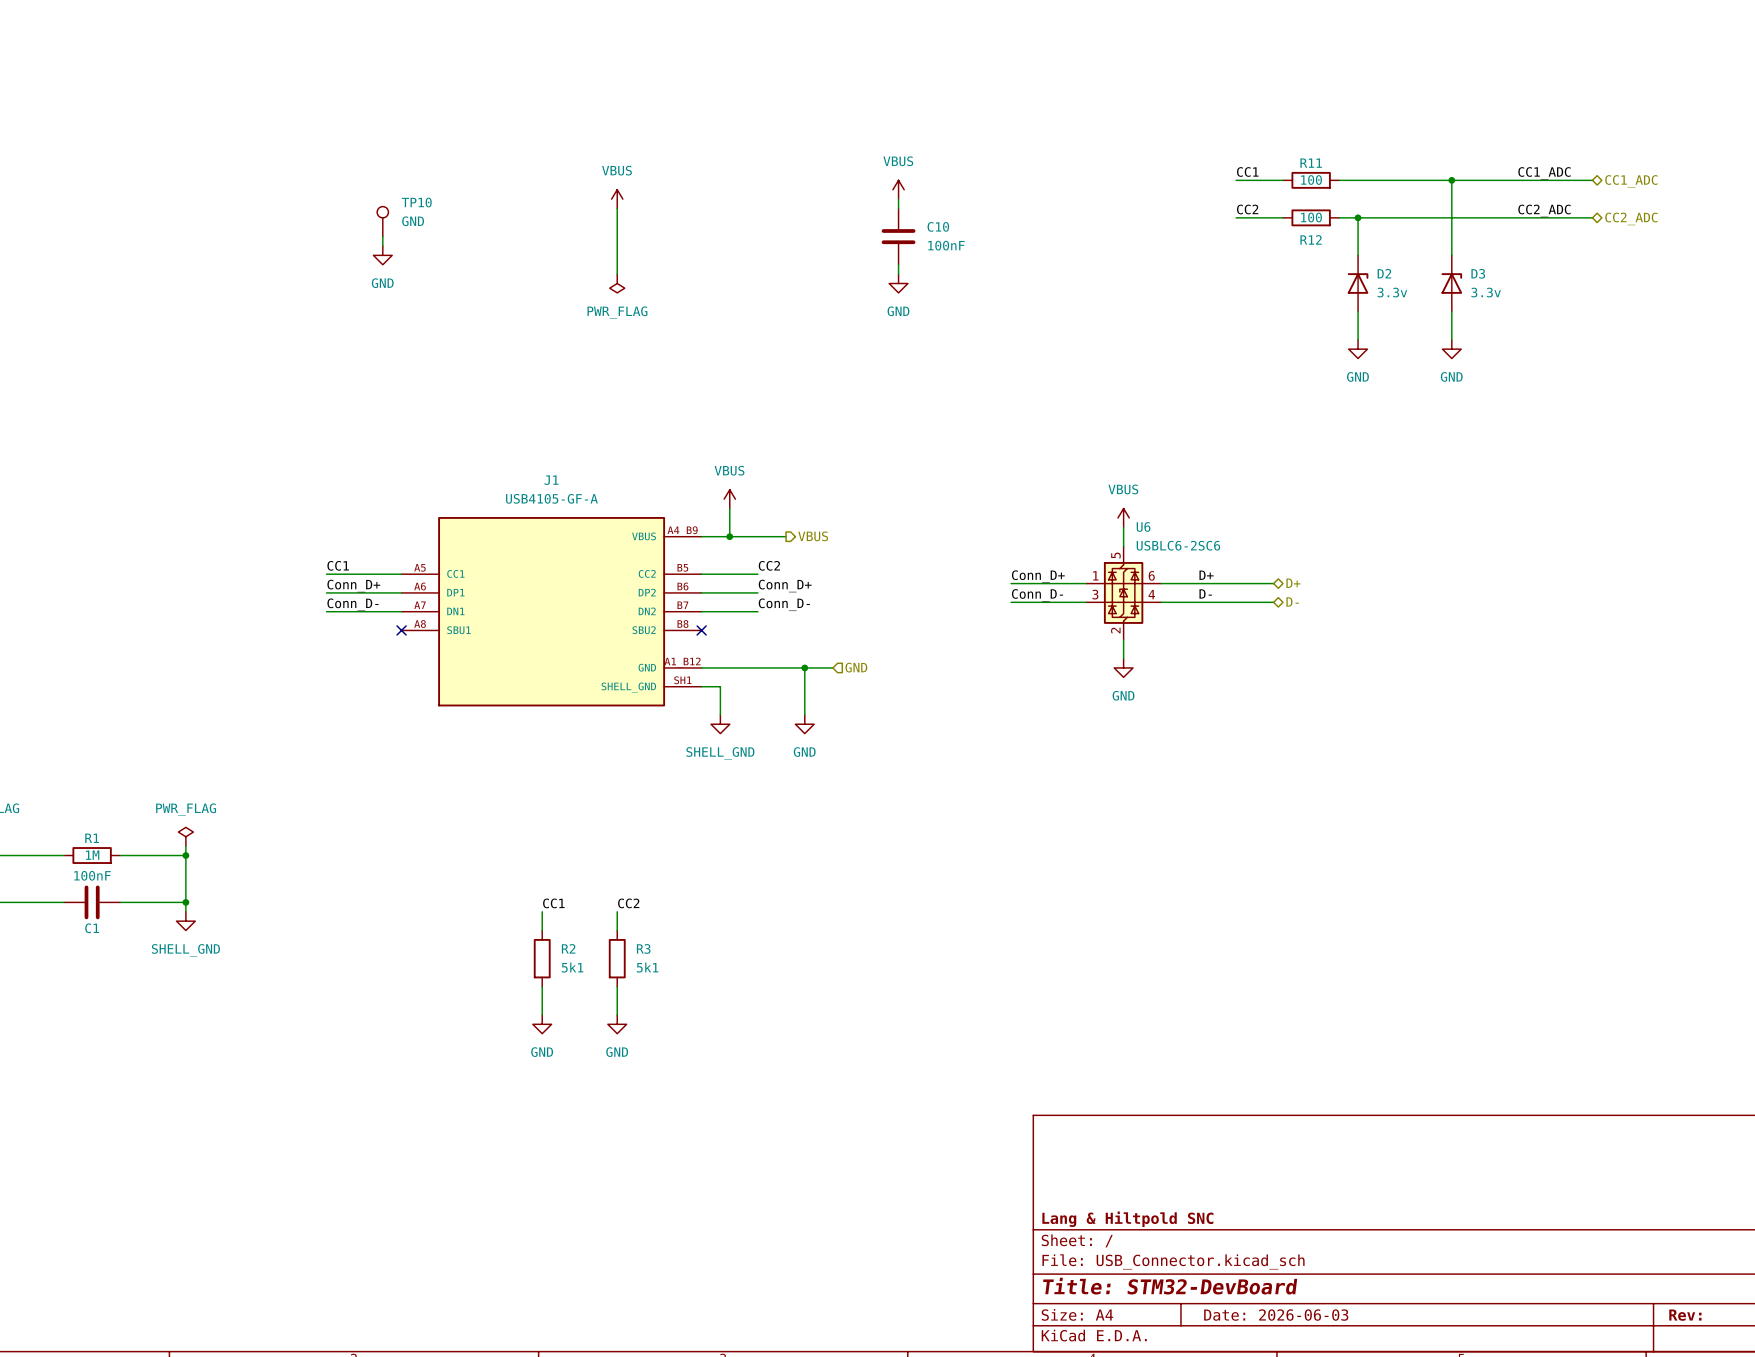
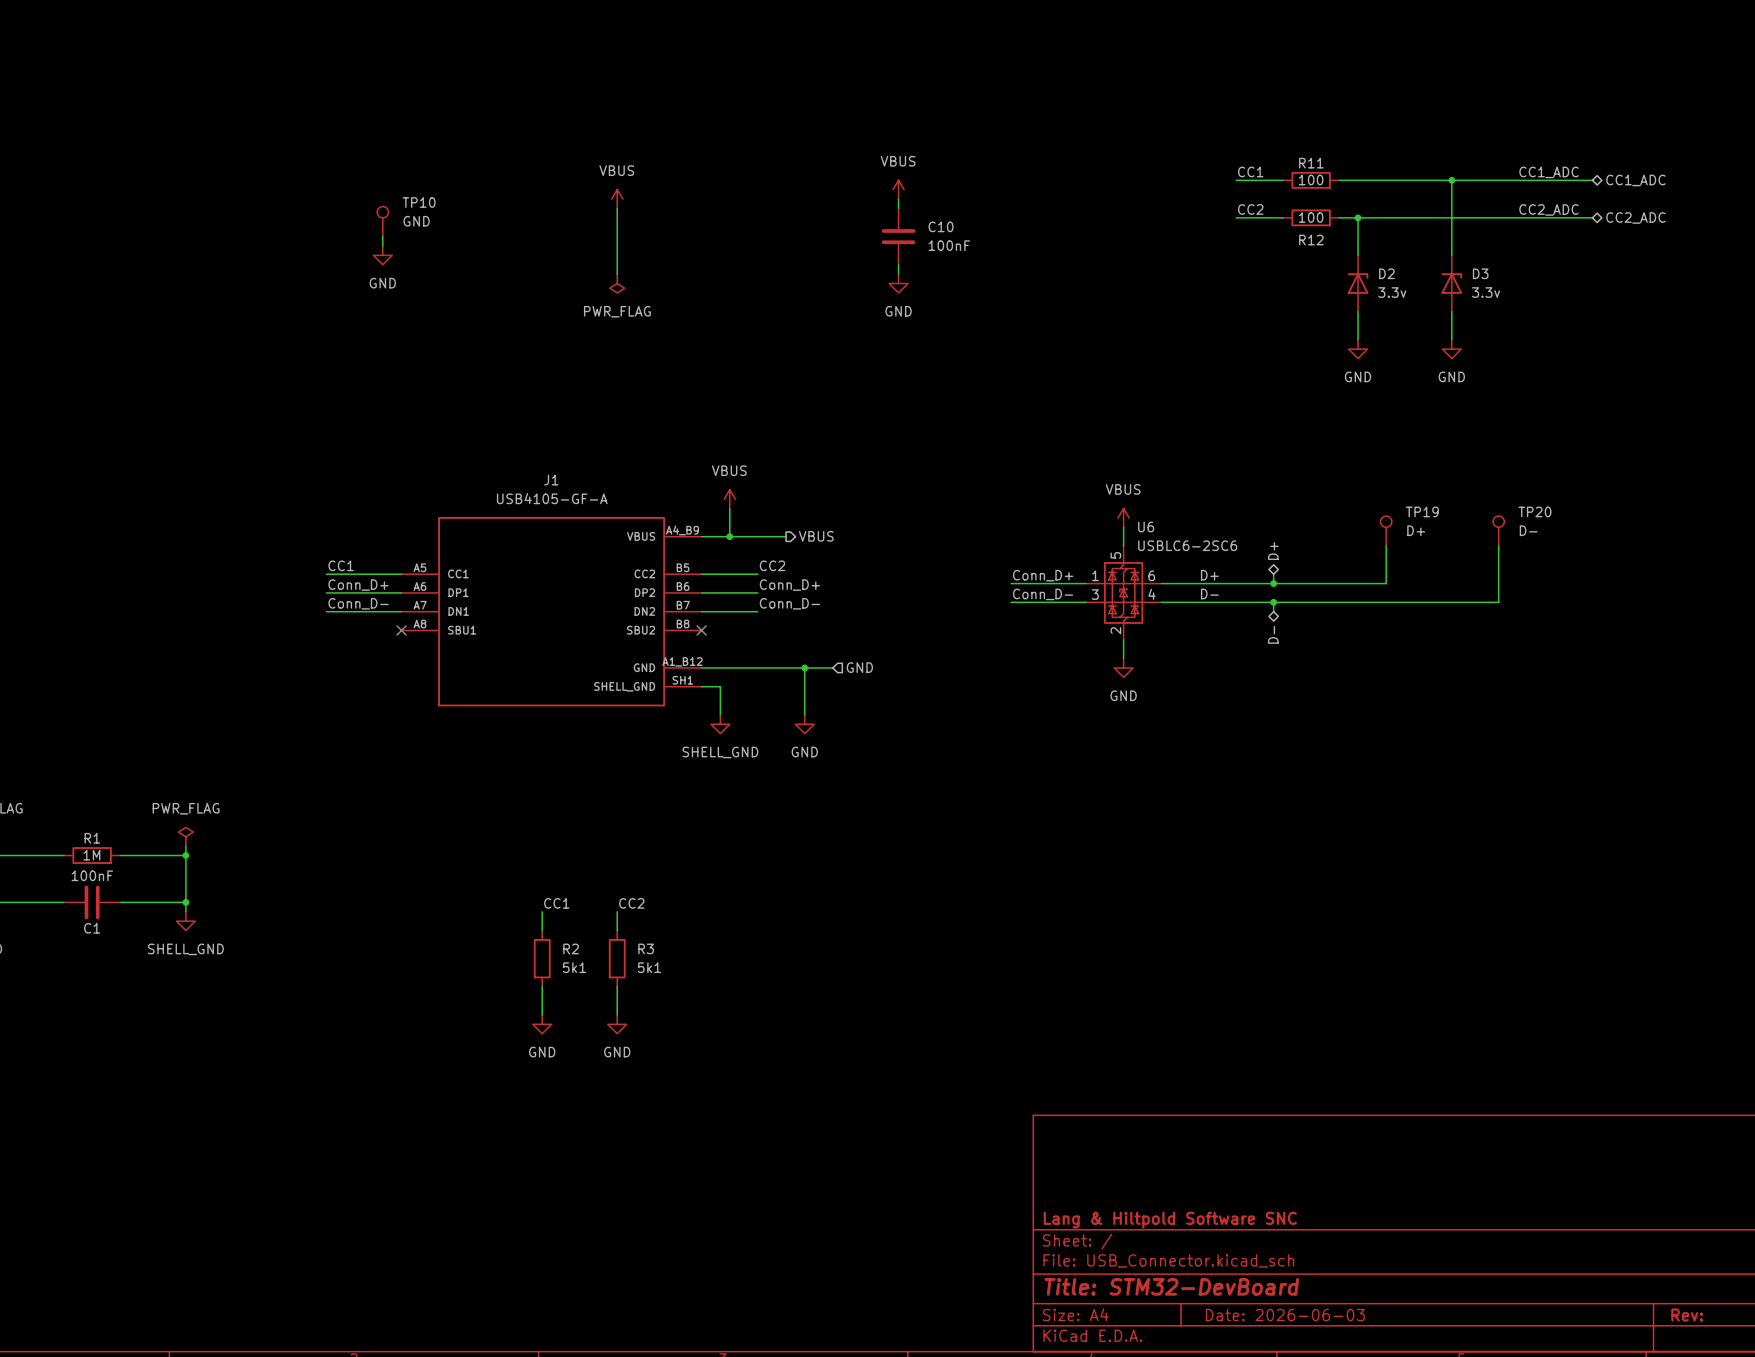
TP19: none -> D+ (1386, 531)
TP20: none -> D- (1498, 531)
wire: none -> (1386, 546) (1386, 583) (1273, 583) (1273, 574)
wire: none -> (1498, 546) (1498, 602) (1273, 602) (1273, 611)
junction: none -> (1273, 583)
hierarchical label rotation: 0° (1293, 583) -> 90° counterclockwise (1273, 551)
hierarchical label position: D+ (1293, 583) -> D+ (1273, 551)
hierarchical label rotation: 0° (1292, 601) -> 90° clockwise (1273, 634)
hierarchical label position: D- (1292, 601) -> D- (1273, 634)
junction: none -> (1273, 602)
title block: Lang & Hiltpold SNC (1127, 1219) -> Lang & Hiltpold Software SNC (1170, 1220)

